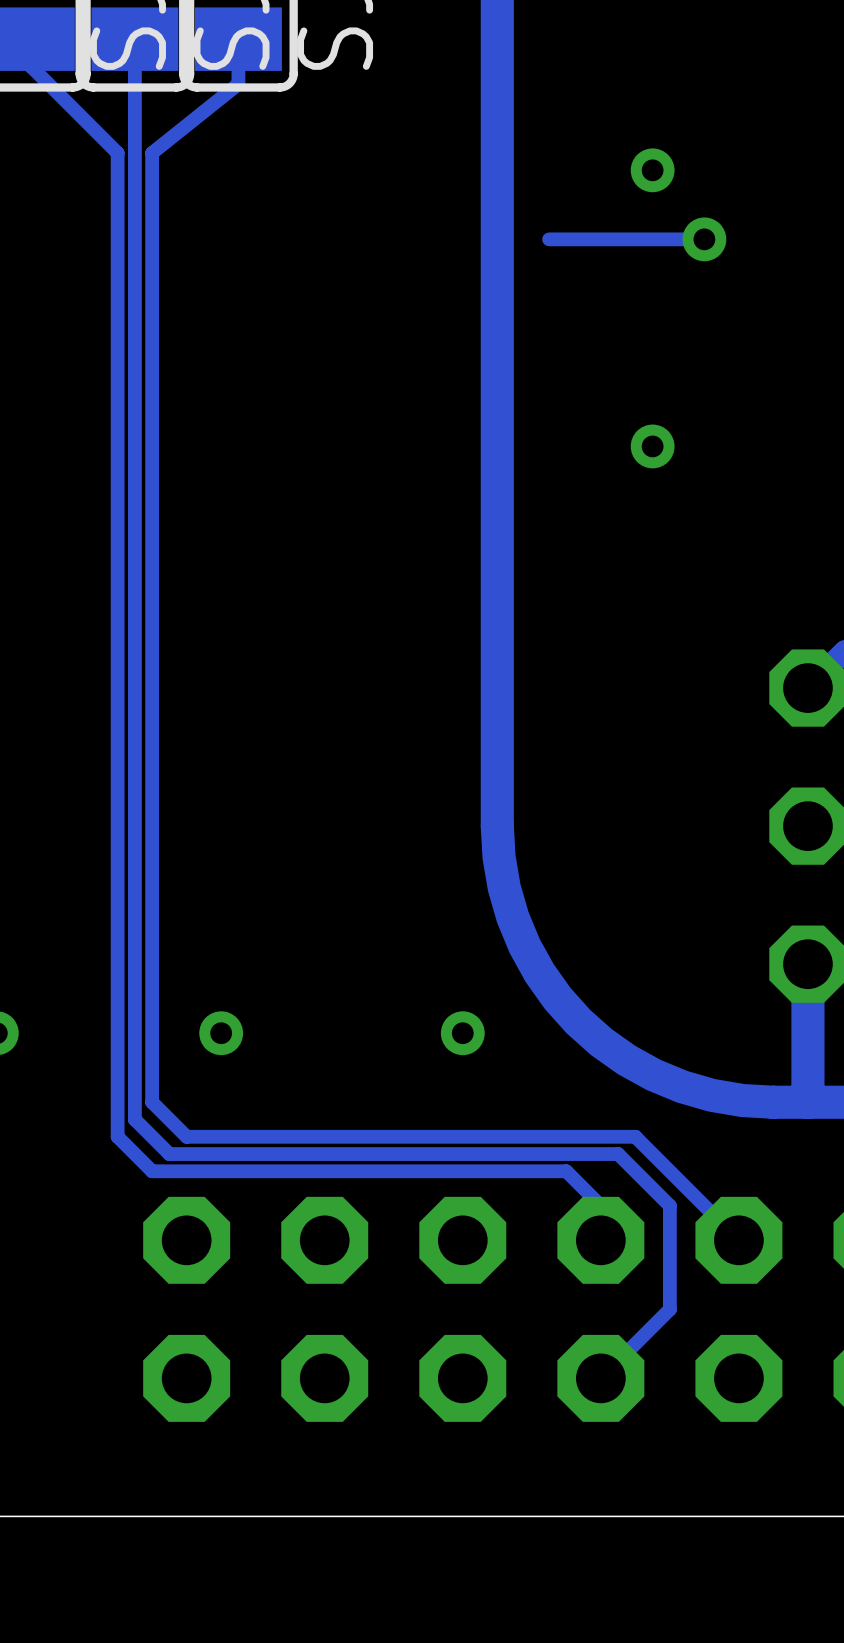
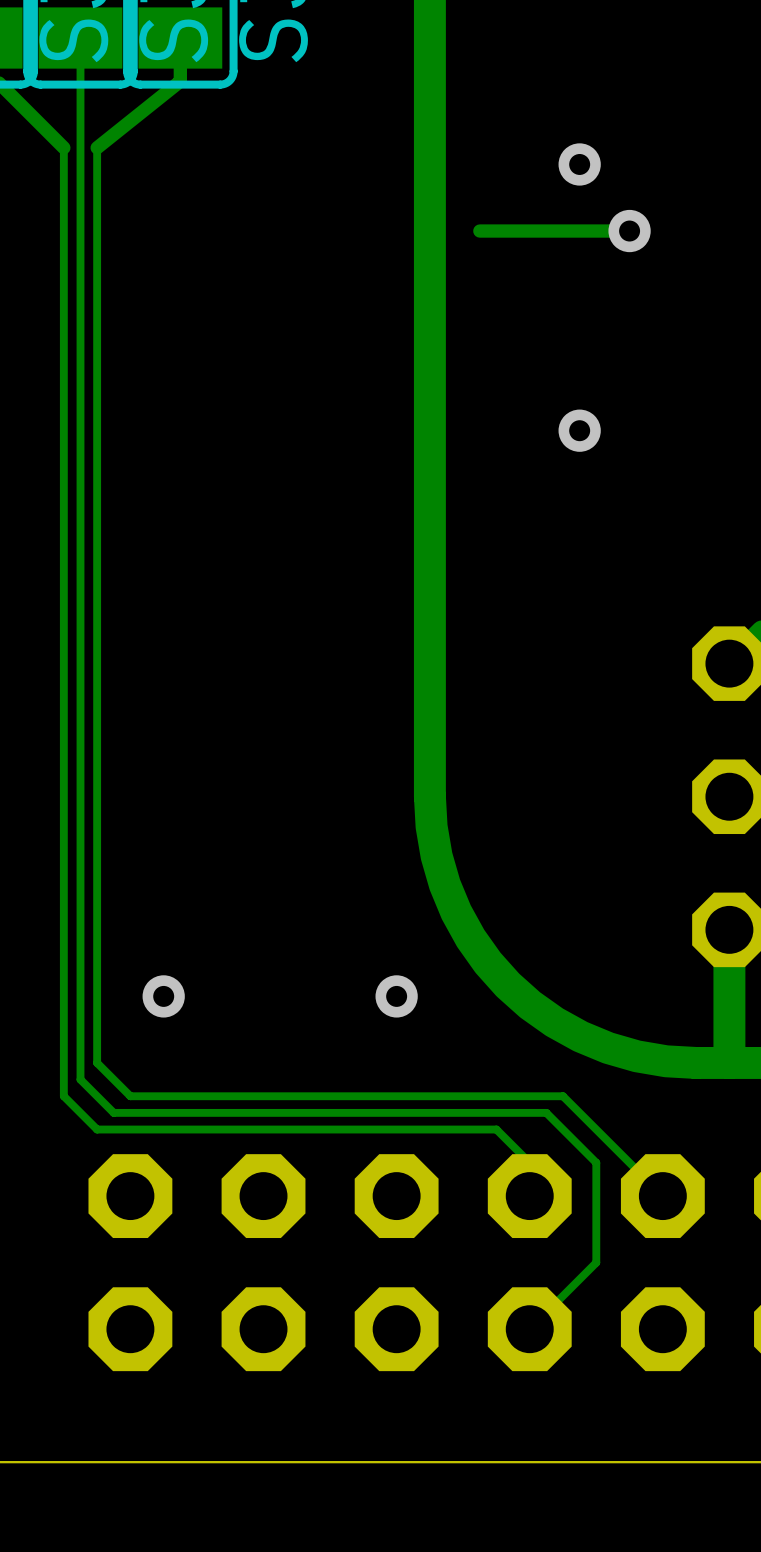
track width: thick (134, 39) (134, 1119) (169, 1154) (618, 1154) (669, 1205) (669, 1309) (600, 1378) -> thin (80, 38) (80, 1079) (113, 1112) (546, 1112) (596, 1162) (596, 1262) (529, 1329)
track width: thick (117, 153) (117, 1136) (152, 1171) (566, 1171) (600, 1205) (600, 1240) -> thin (63, 147) (63, 1096) (97, 1129) (496, 1129) (529, 1162) (529, 1196)
track width: thick (152, 153) (152, 1102) (186, 1136) (635, 1136) (738, 1240) -> thin (97, 147) (97, 1062) (130, 1096) (563, 1096) (662, 1196)

